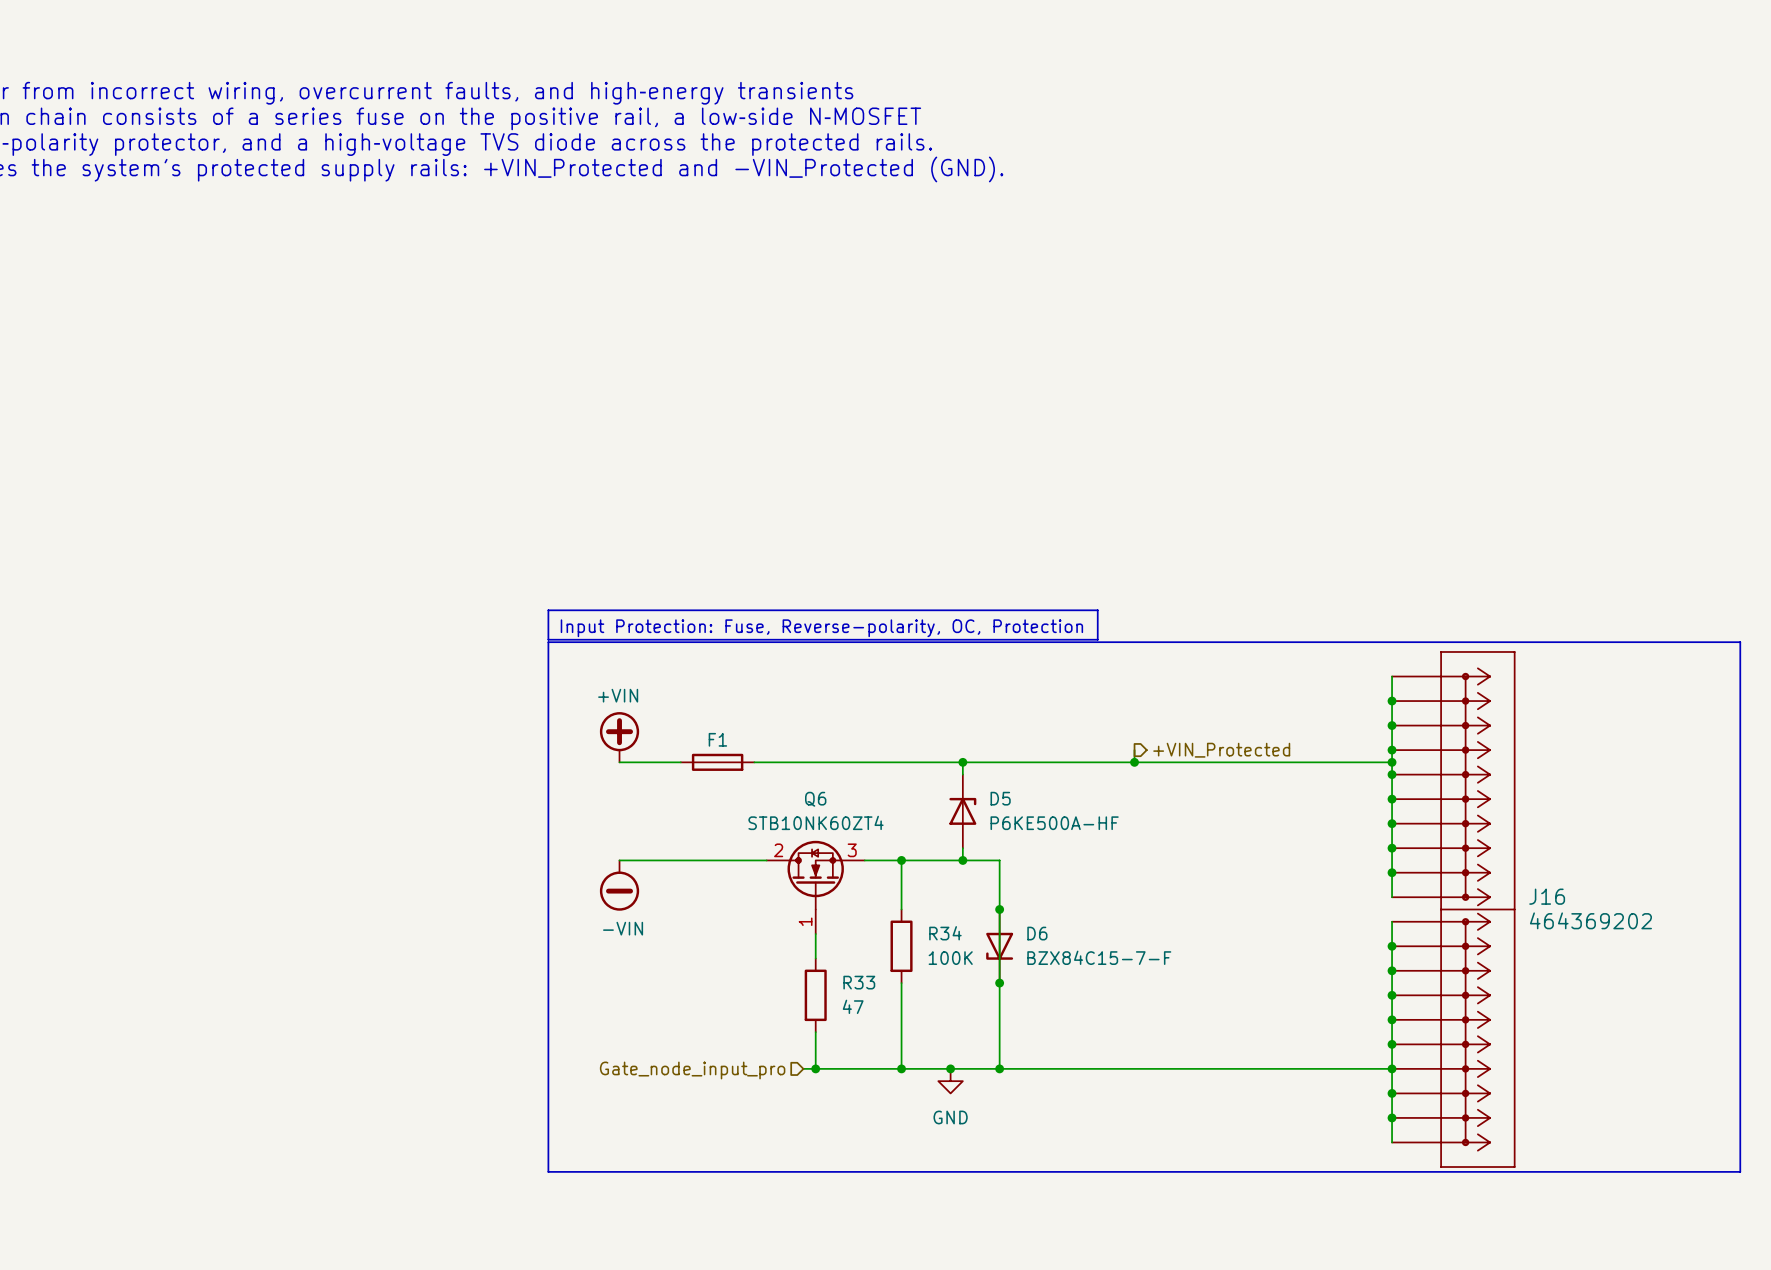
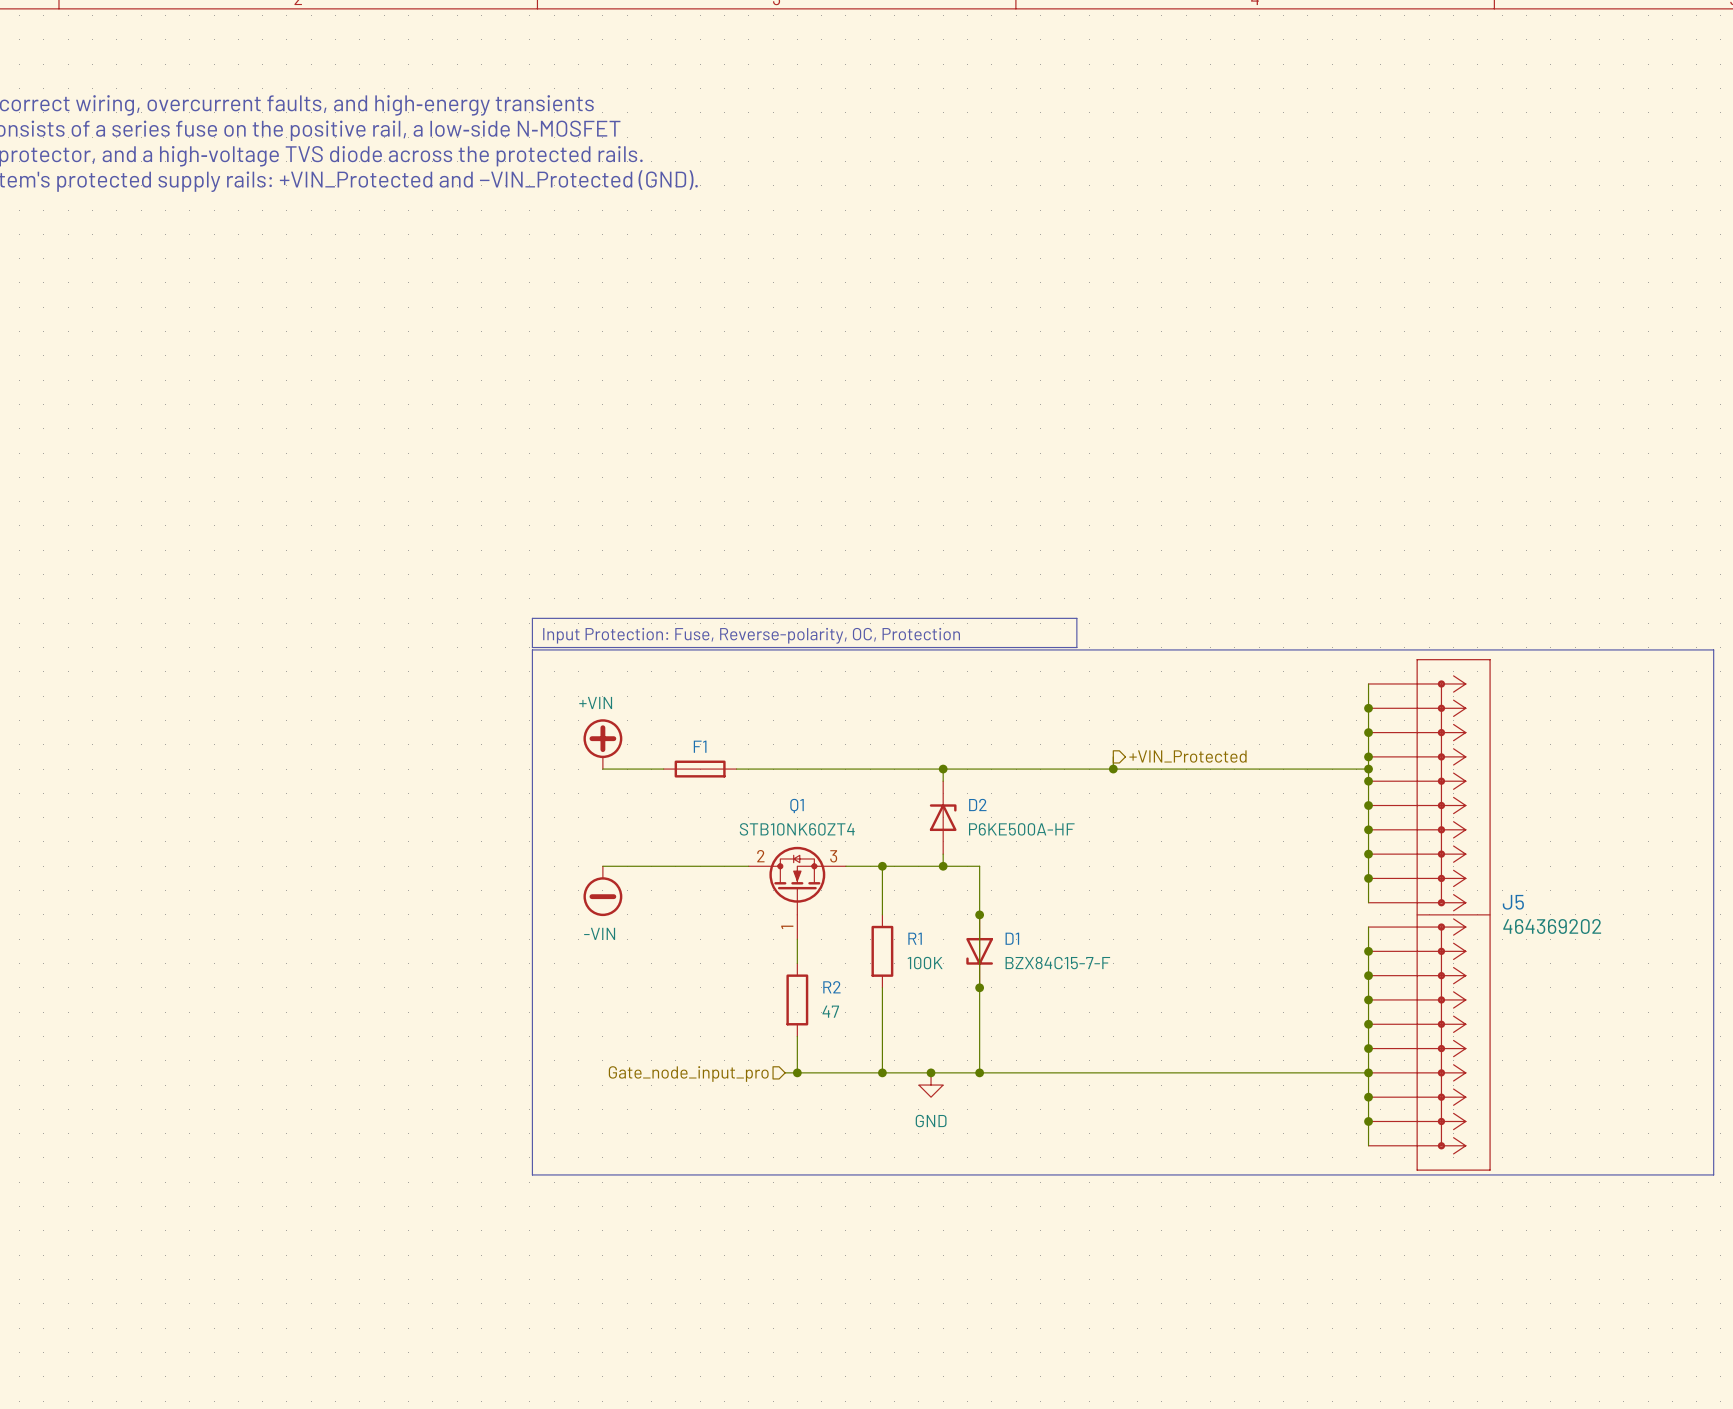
D5 name: D5 (1000, 798) -> D2 (977, 804)
Q6 name: Q6 (815, 799) -> Q1 (797, 805)
J16 name: J16 (1547, 896) -> J5 (1513, 902)
R34 name: R34 (945, 933) -> R1 (915, 938)
D6 name: D6 (1037, 933) -> D1 (1012, 938)
R33 name: R33 (859, 982) -> R2 (831, 987)

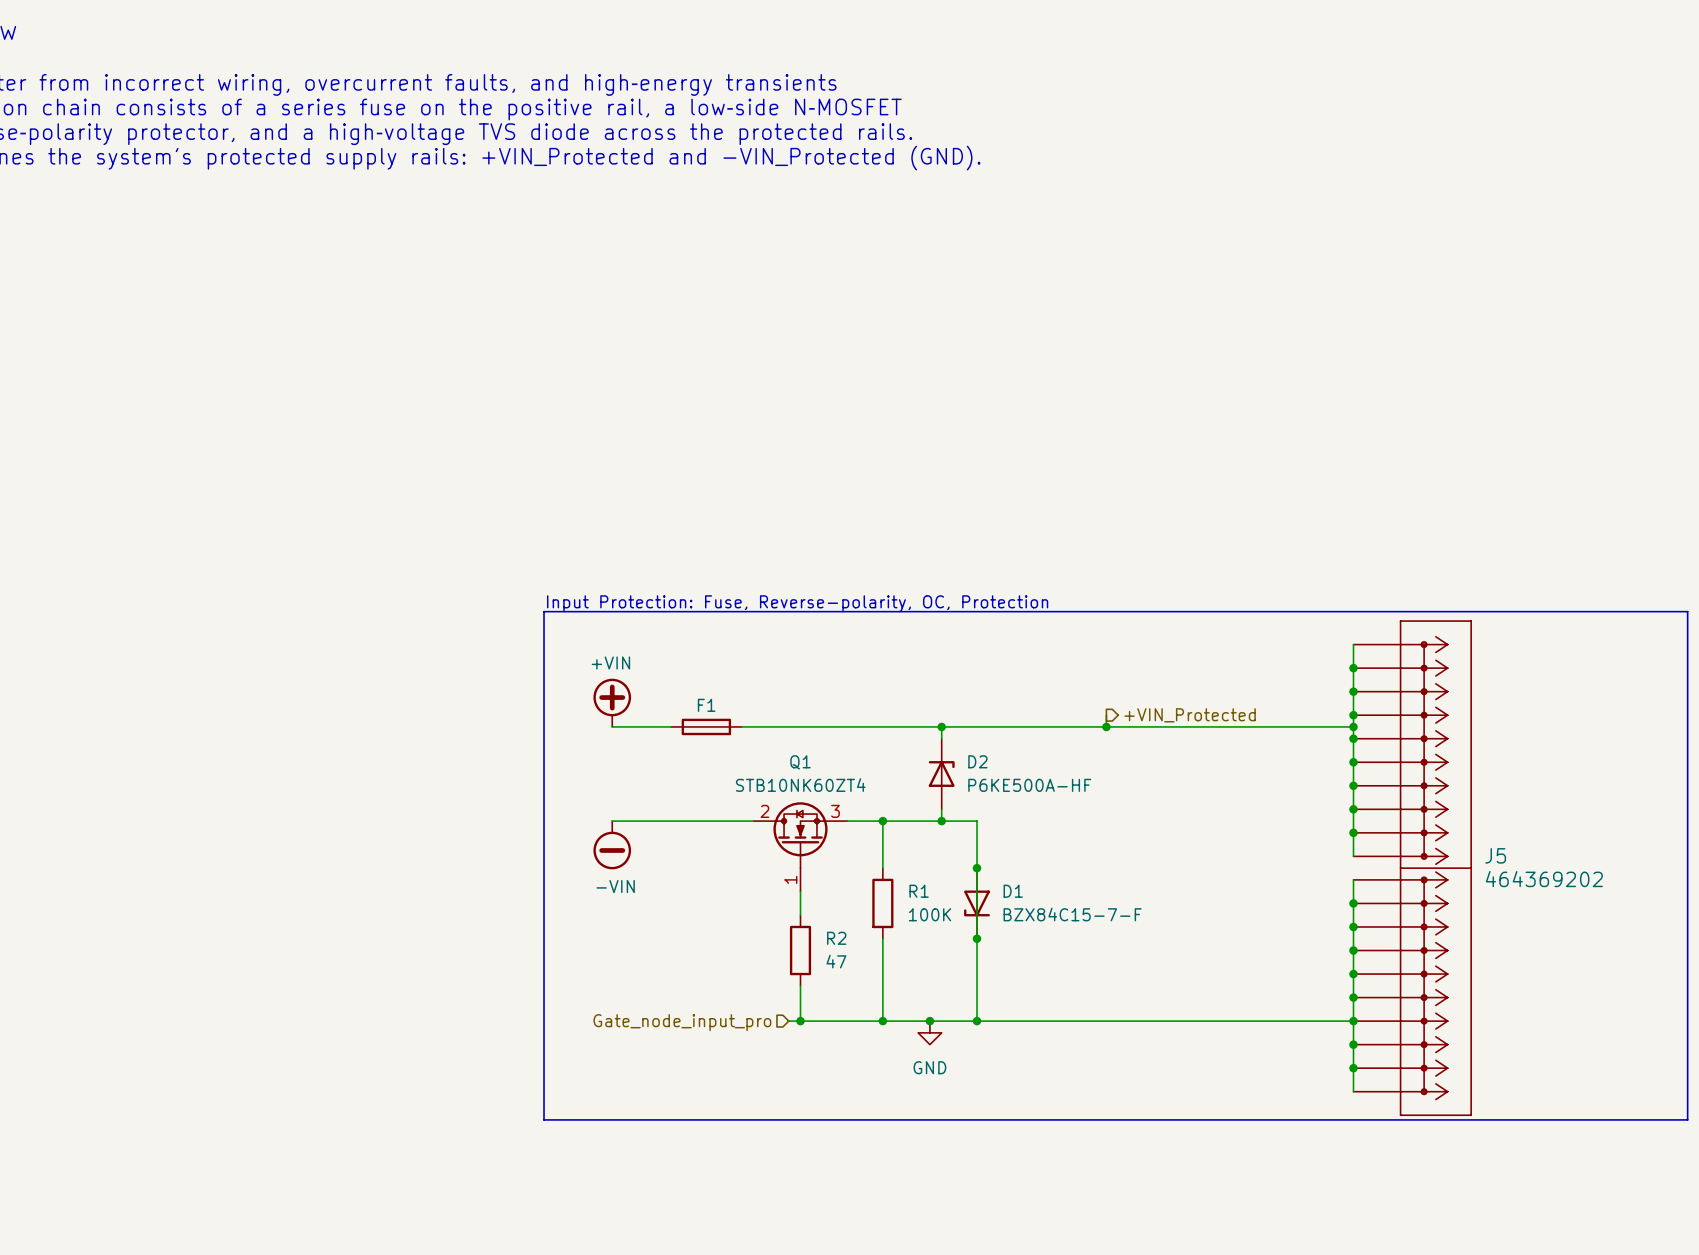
line: (532, 618) (1076, 618) (1076, 647) (532, 647) (532, 618) -> none
text position: Input Protection: Fuse, Reverse-polarity, OC, Protection (751, 635) -> Input Protection: Fuse, Reverse-polarity, OC, Protection (797, 603)

